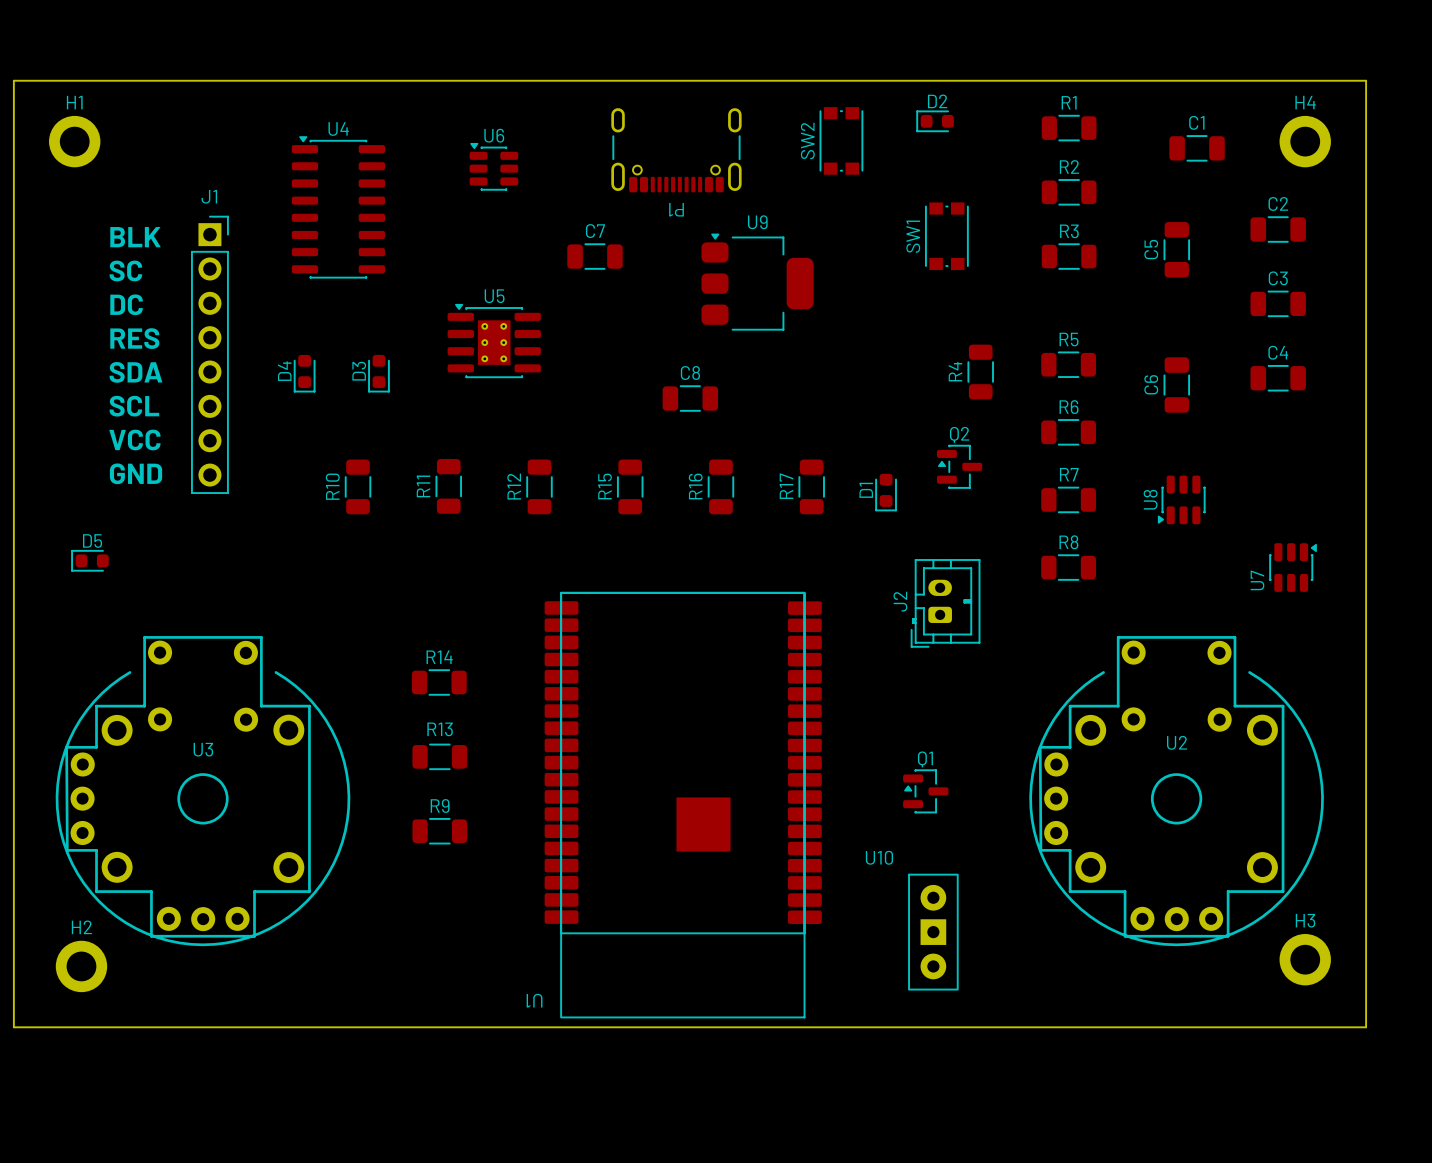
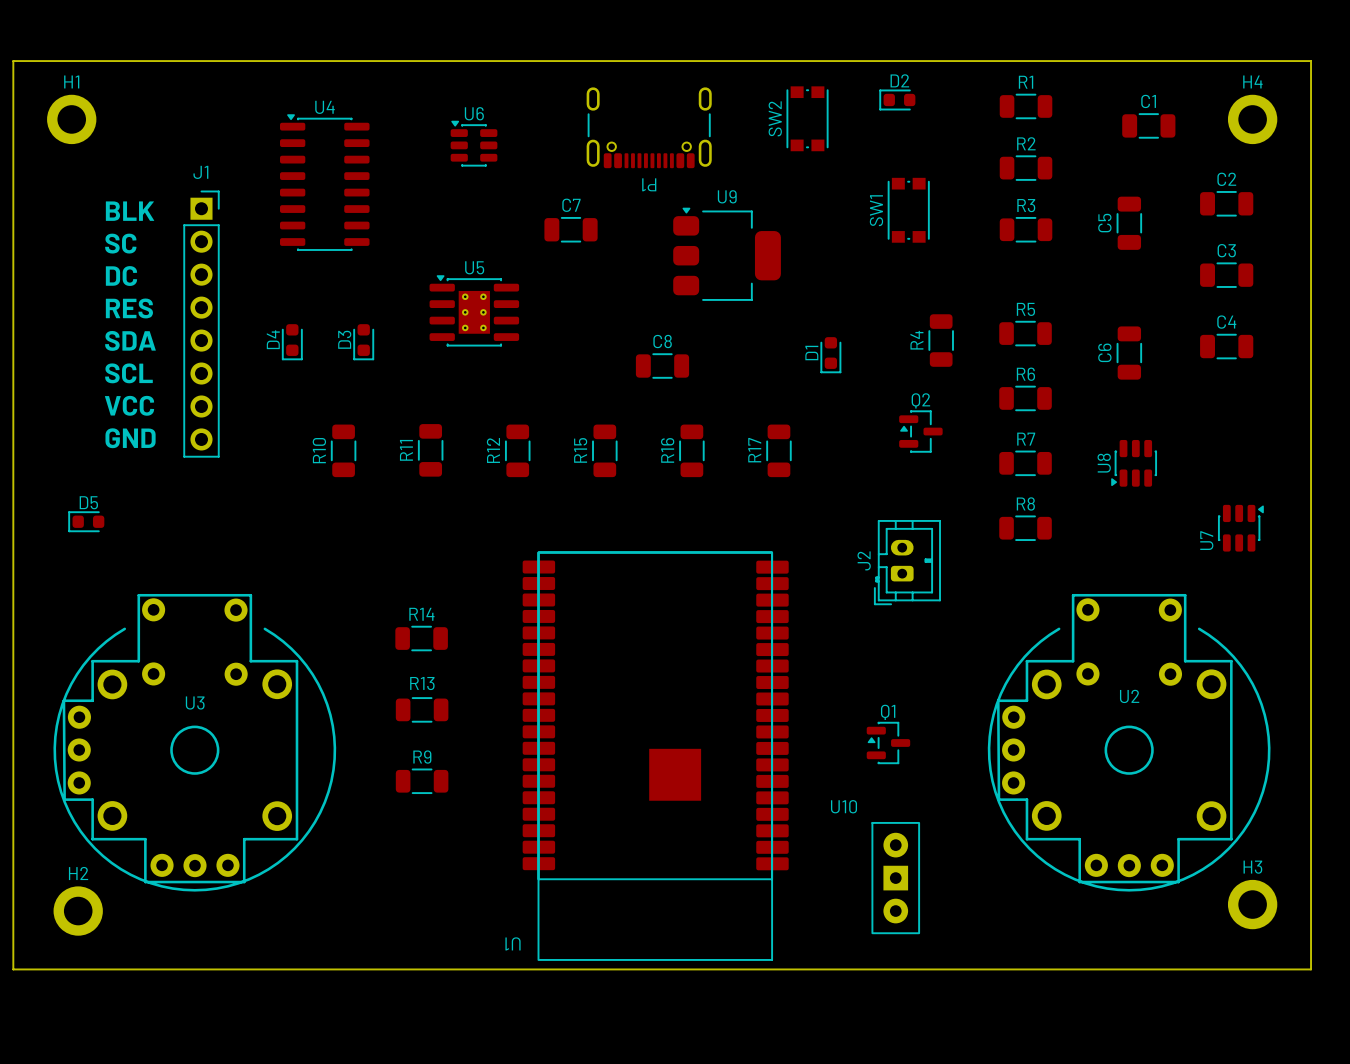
D1 position: (886, 492) -> (830, 355)

